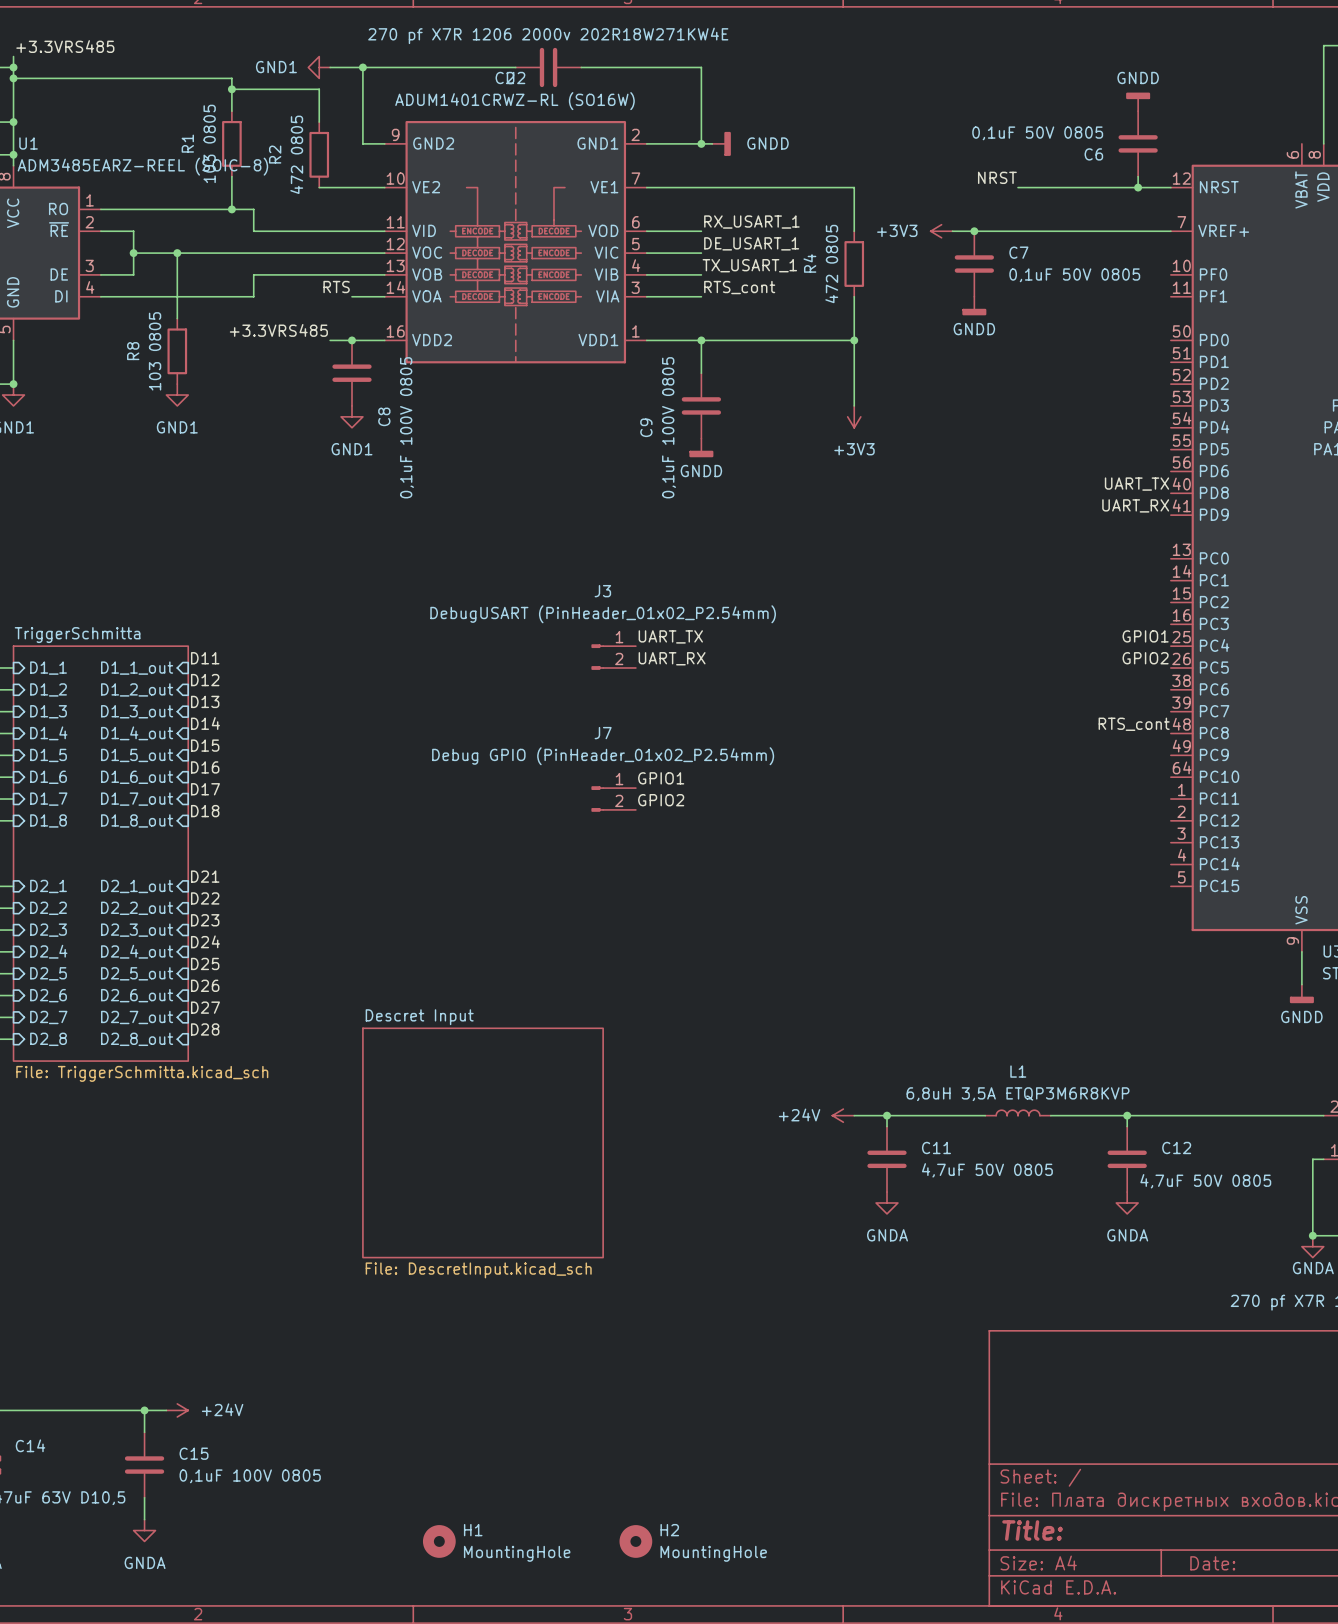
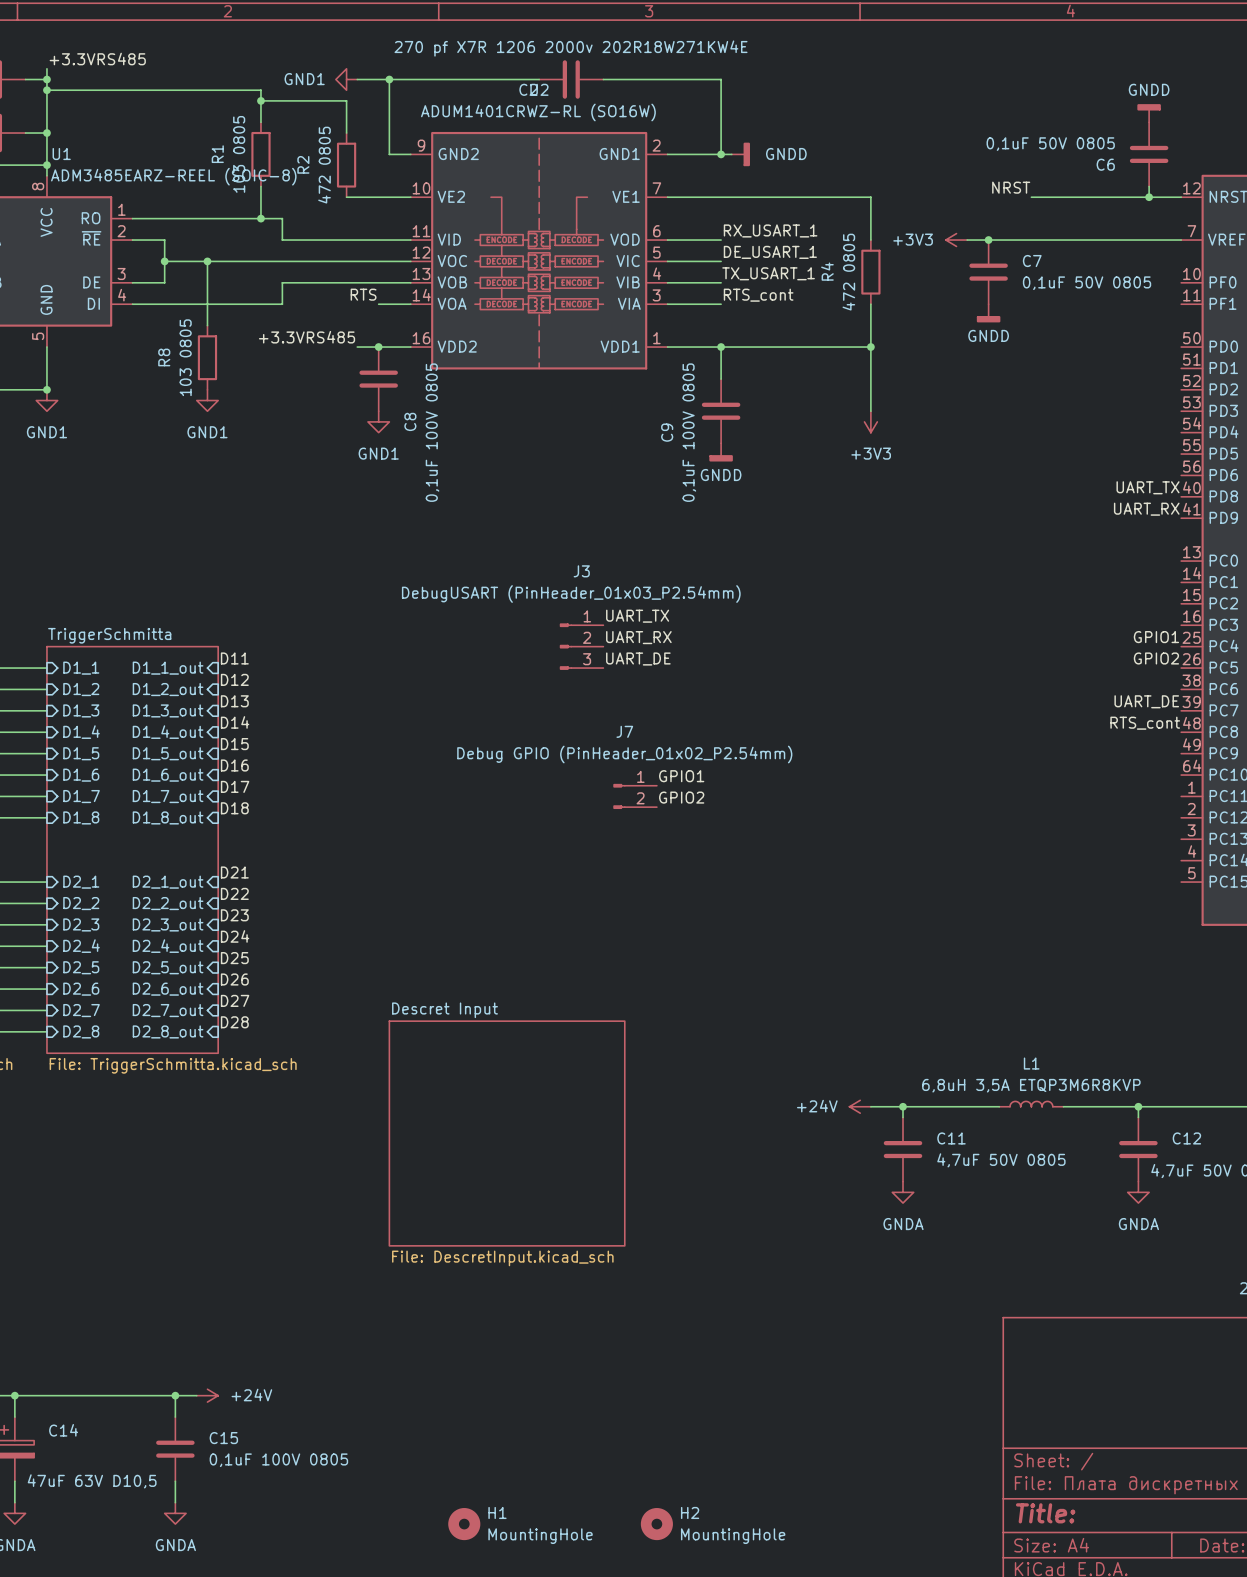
J3 value: DebugUSART (PinHeader_01x02_P2.54mm) (603, 614) -> DebugUSART (PinHeader_01x03_P2.54mm) (571, 594)
label position: UART_TX (670, 636) -> UART_TX (637, 616)
J3 symbol: [591, 644, 636, 670] -> [559, 623, 604, 670]
label: none -> UART_DE (638, 659)
label position: UART_RX (672, 658) -> UART_RX (638, 637)
label: none -> UART_DE (1146, 701)

